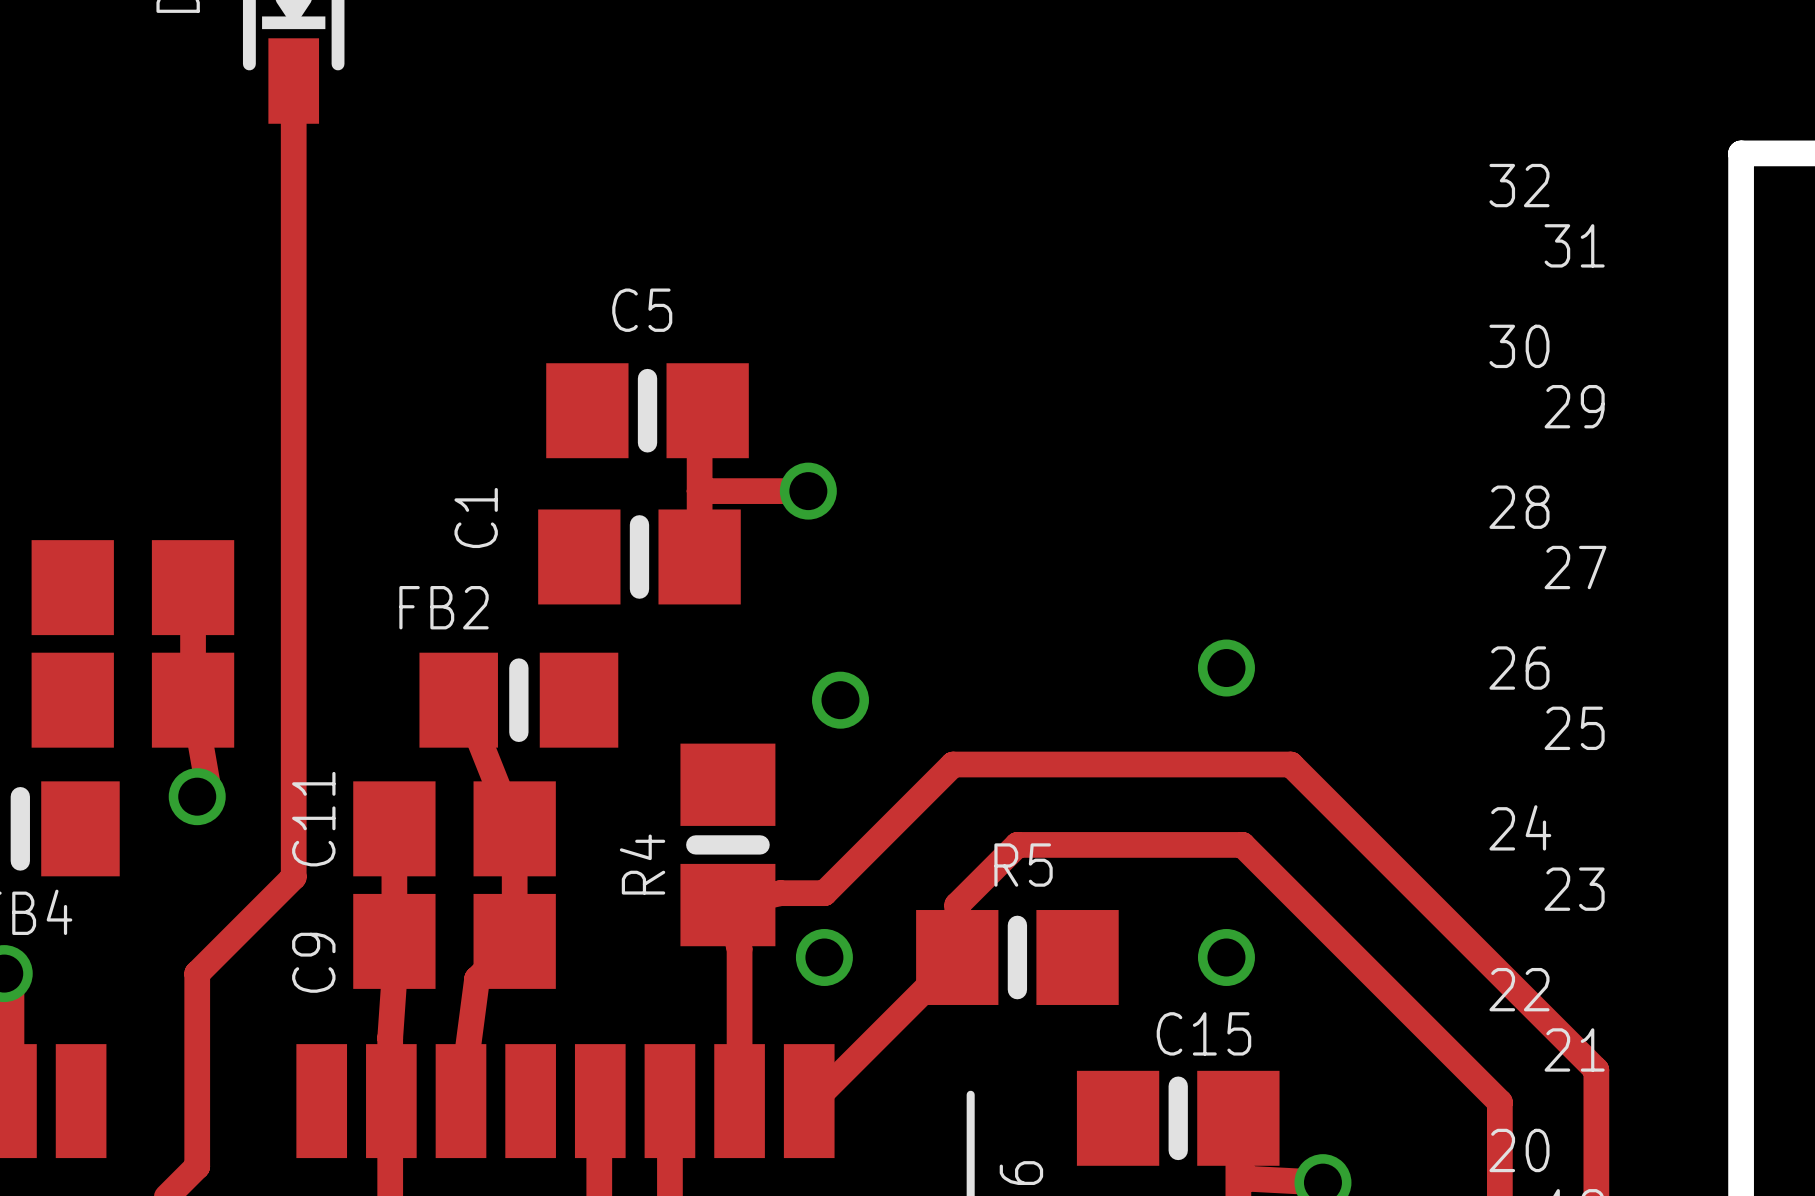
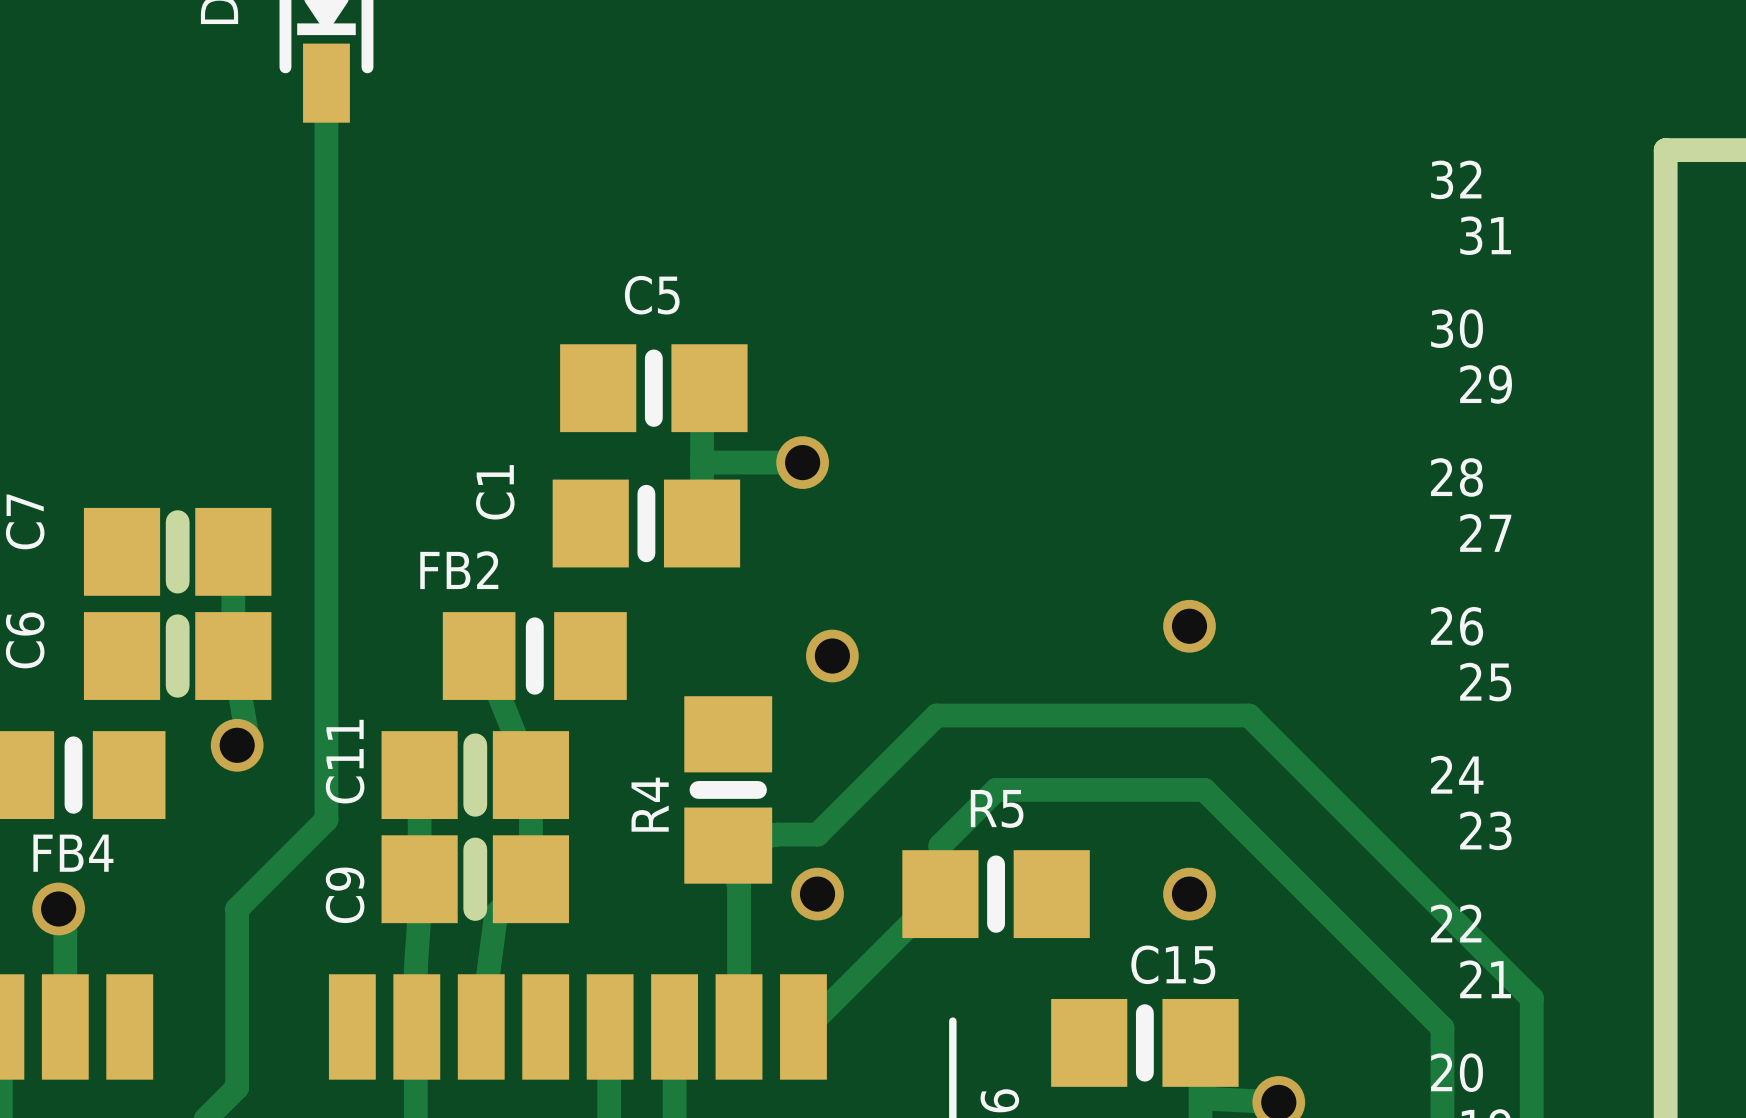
board edge: none -> (177, 522) (177, 581)
board edge: none -> (177, 626) (177, 685)
board edge: none -> (475, 745) (475, 804)
board edge: none -> (475, 849) (475, 908)

